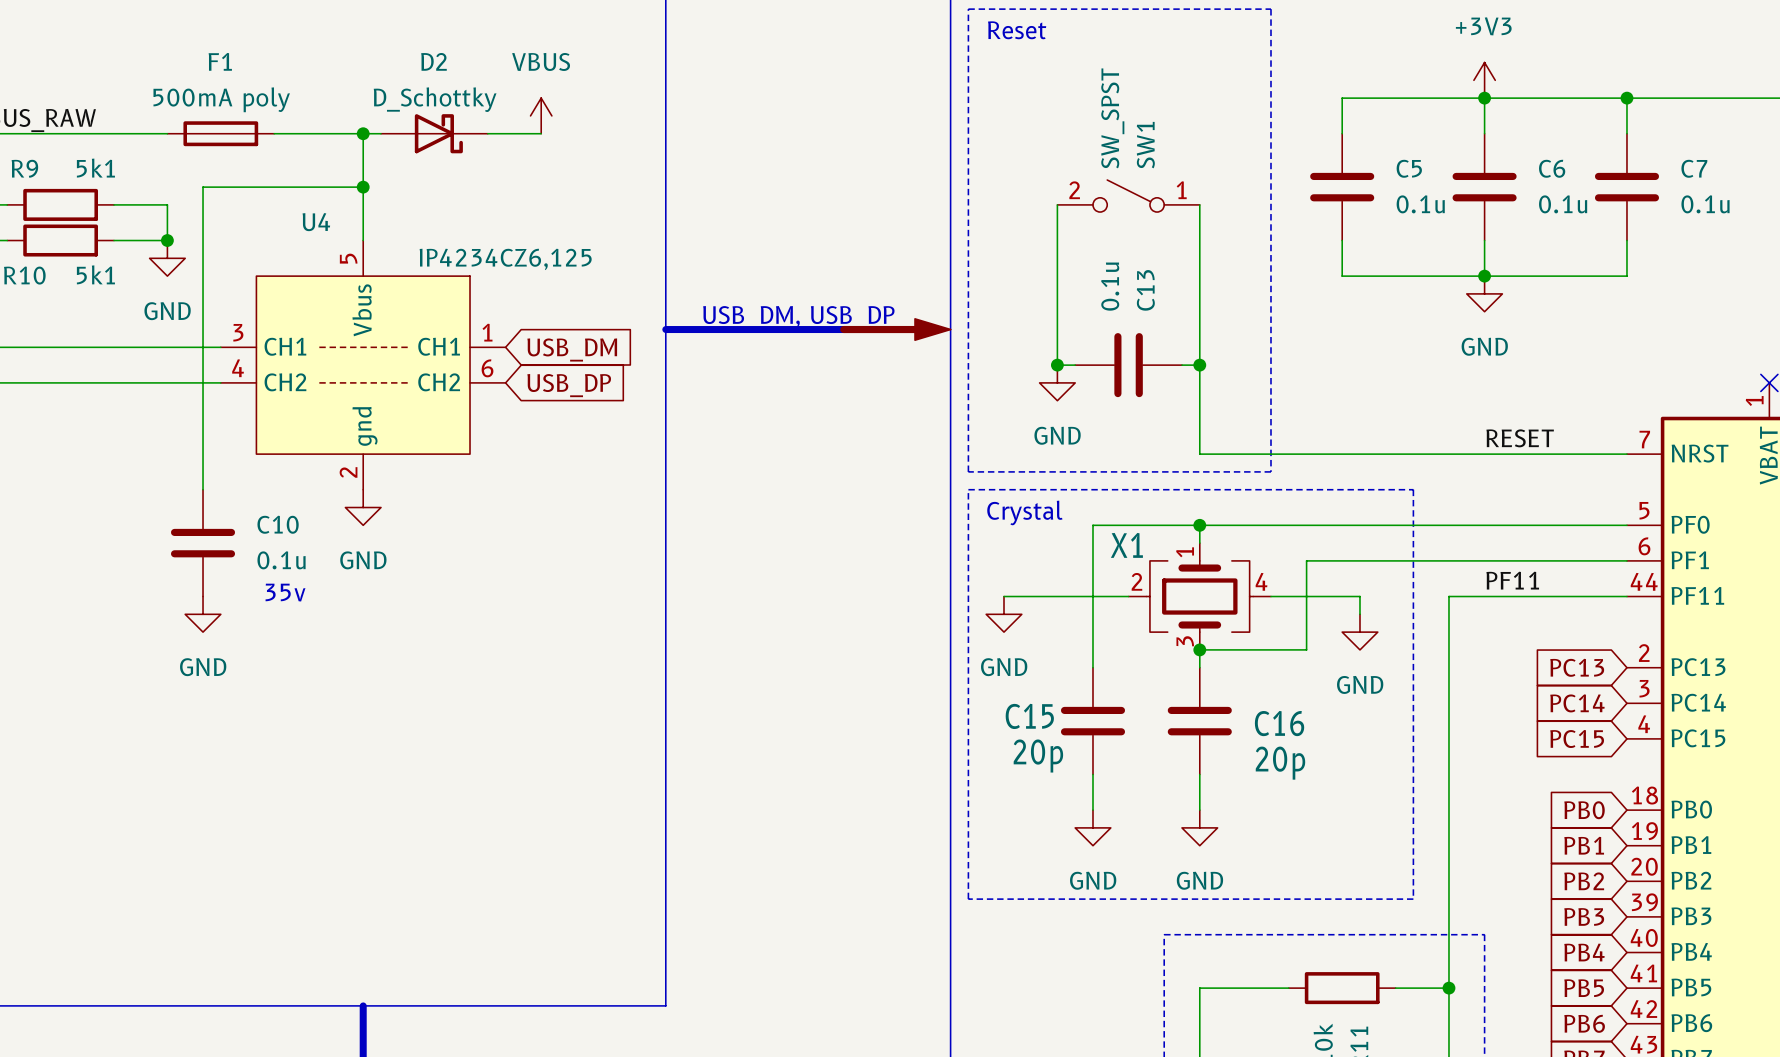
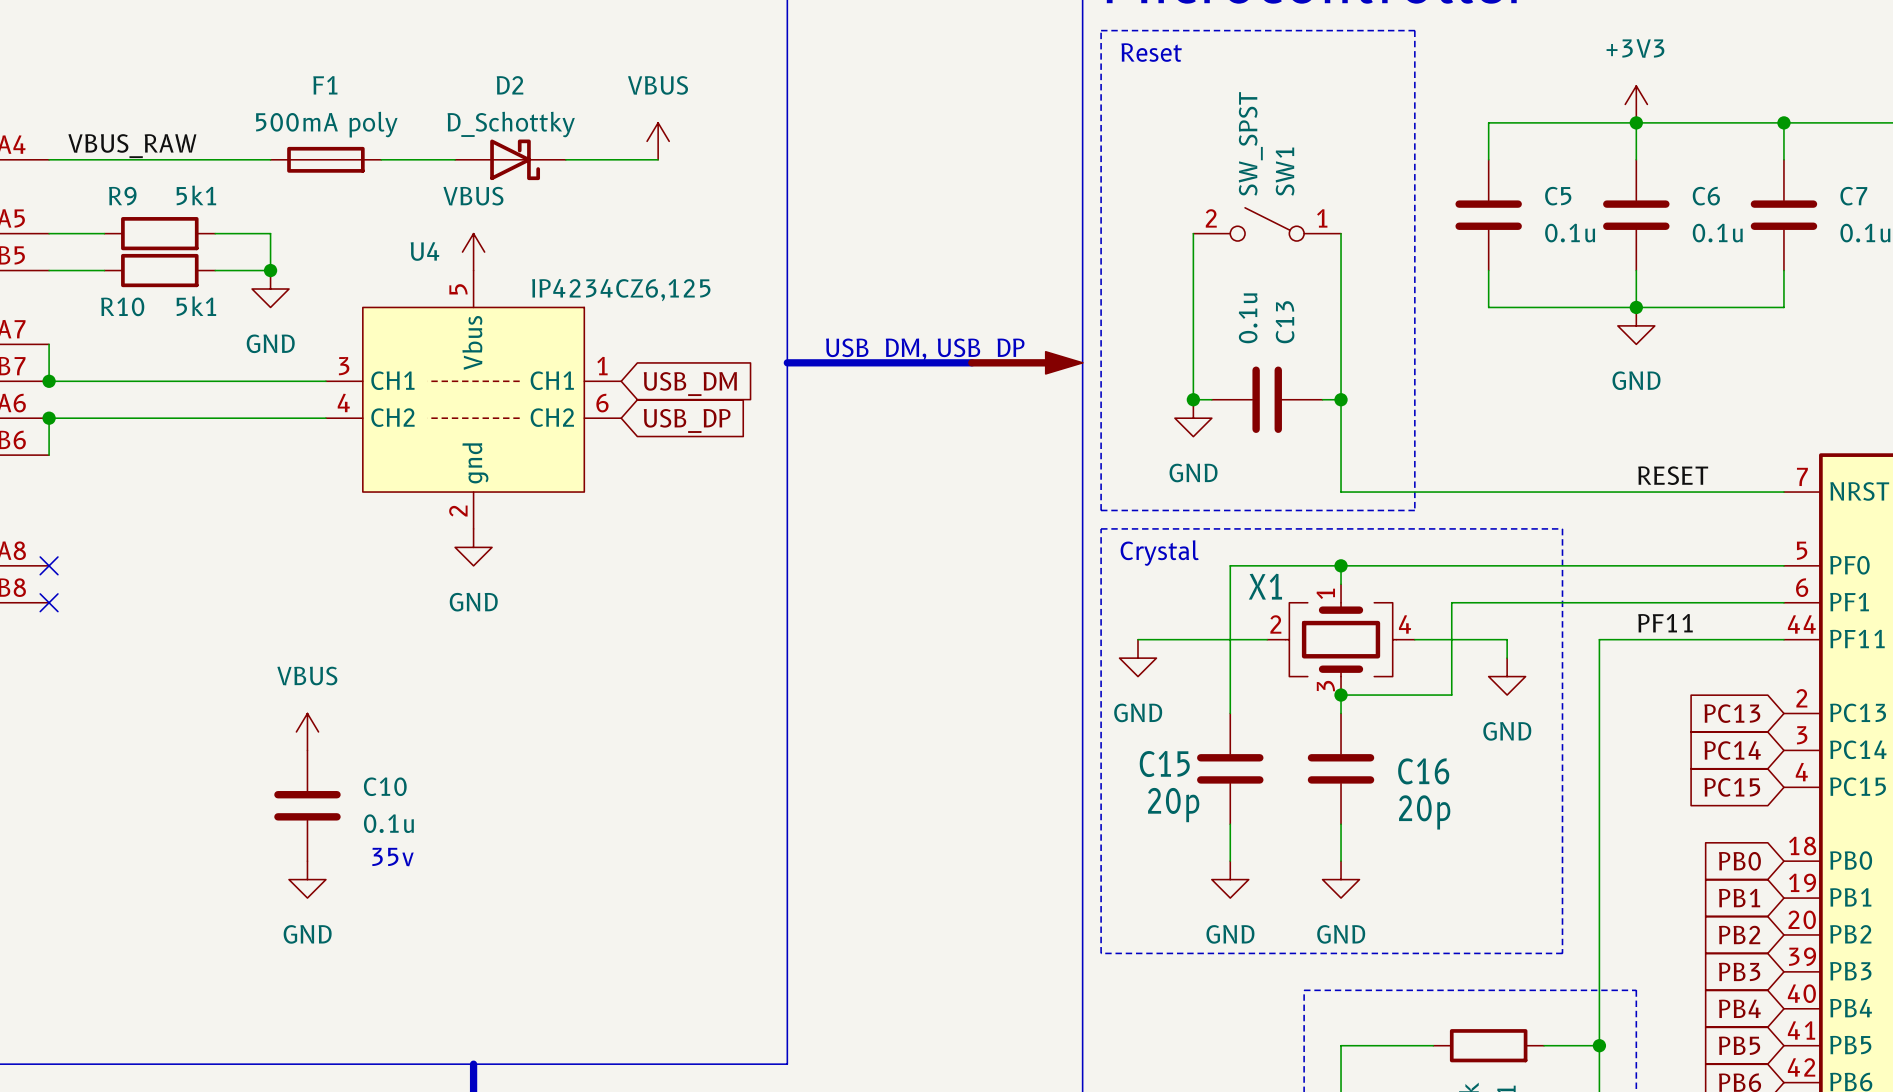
wire: (363, 133) (363, 240) -> none
junction: (363, 133) -> none
D2 position: (434, 133) -> (510, 159)
wire: (363, 187) (203, 187) (203, 489) -> none
junction: (363, 187) -> none
power symbol: none -> VBUS (473, 252)
C10 position: (203, 543) -> (307, 805)
text position: 35v (285, 592) -> 35v (393, 857)
power symbol position: GND (203, 614) -> GND (307, 879)
power symbol: none -> VBUS (307, 731)

